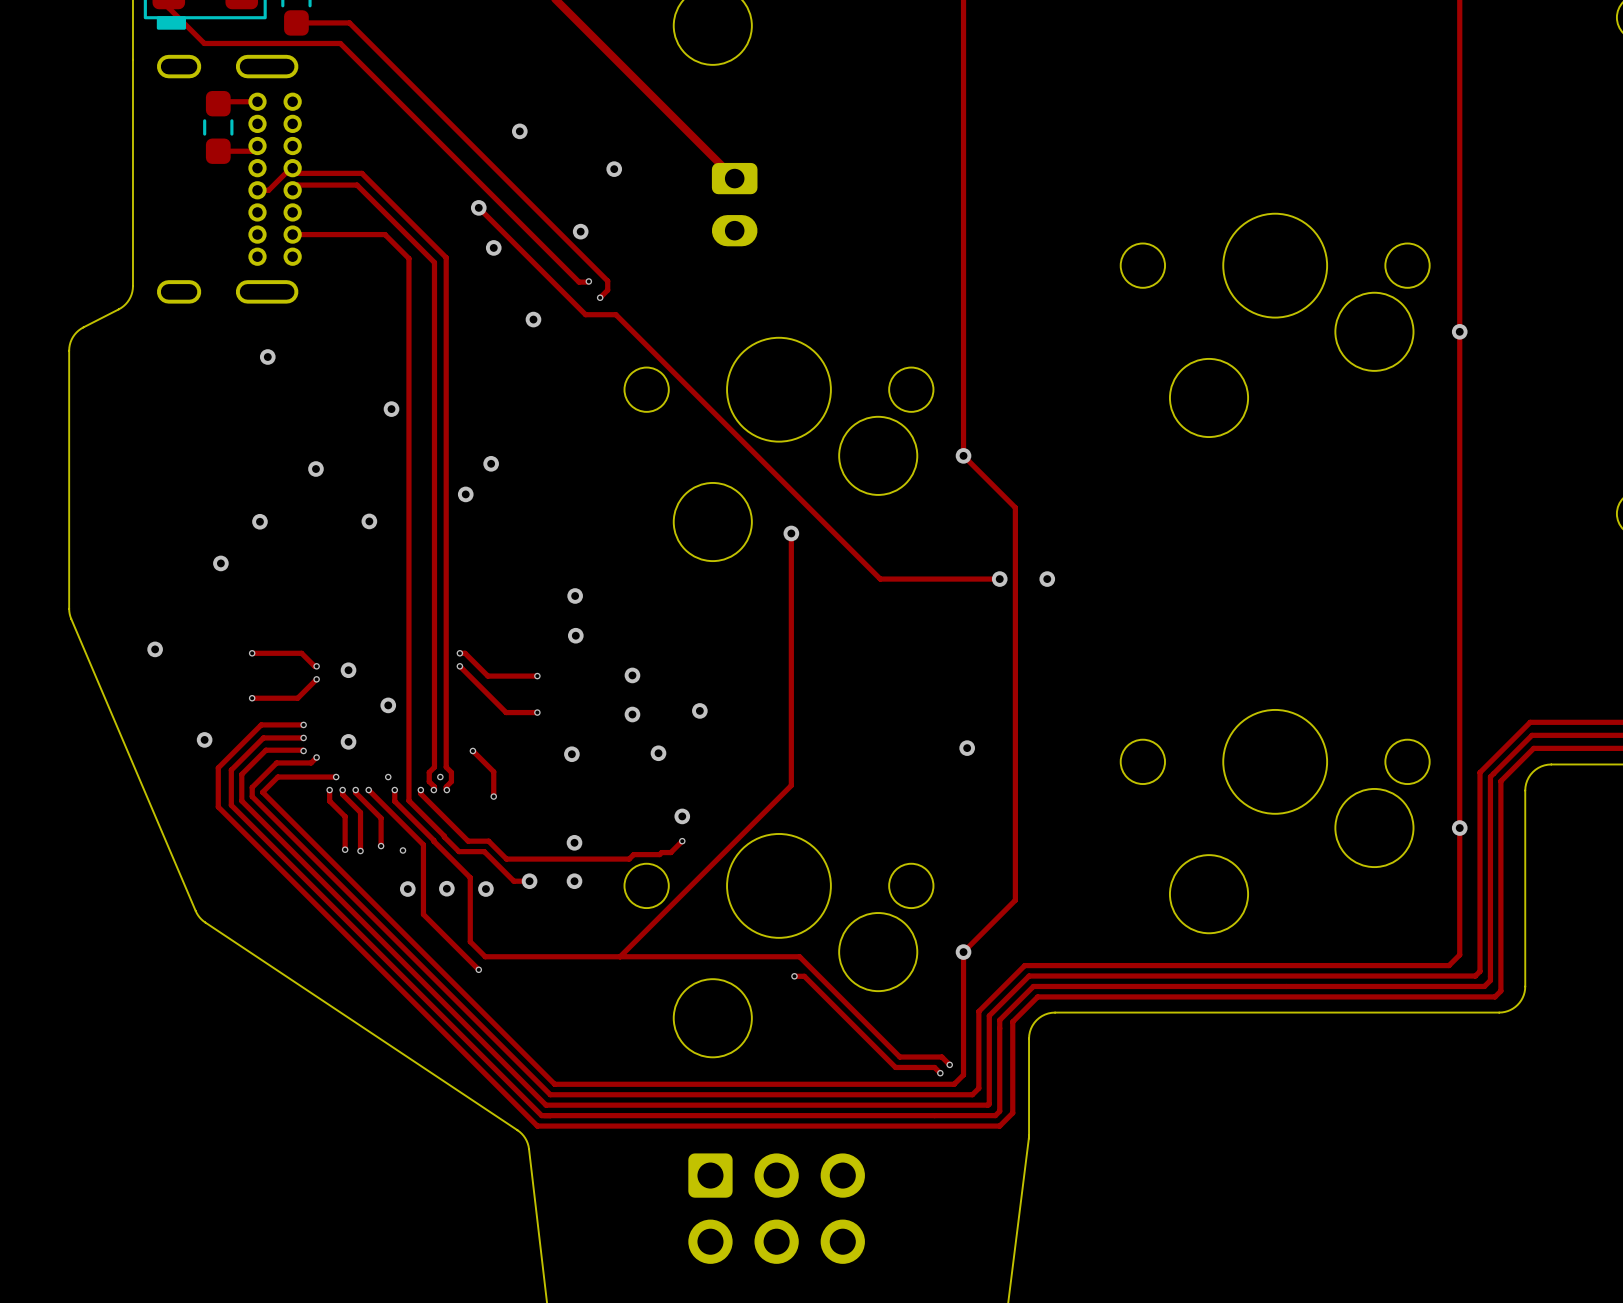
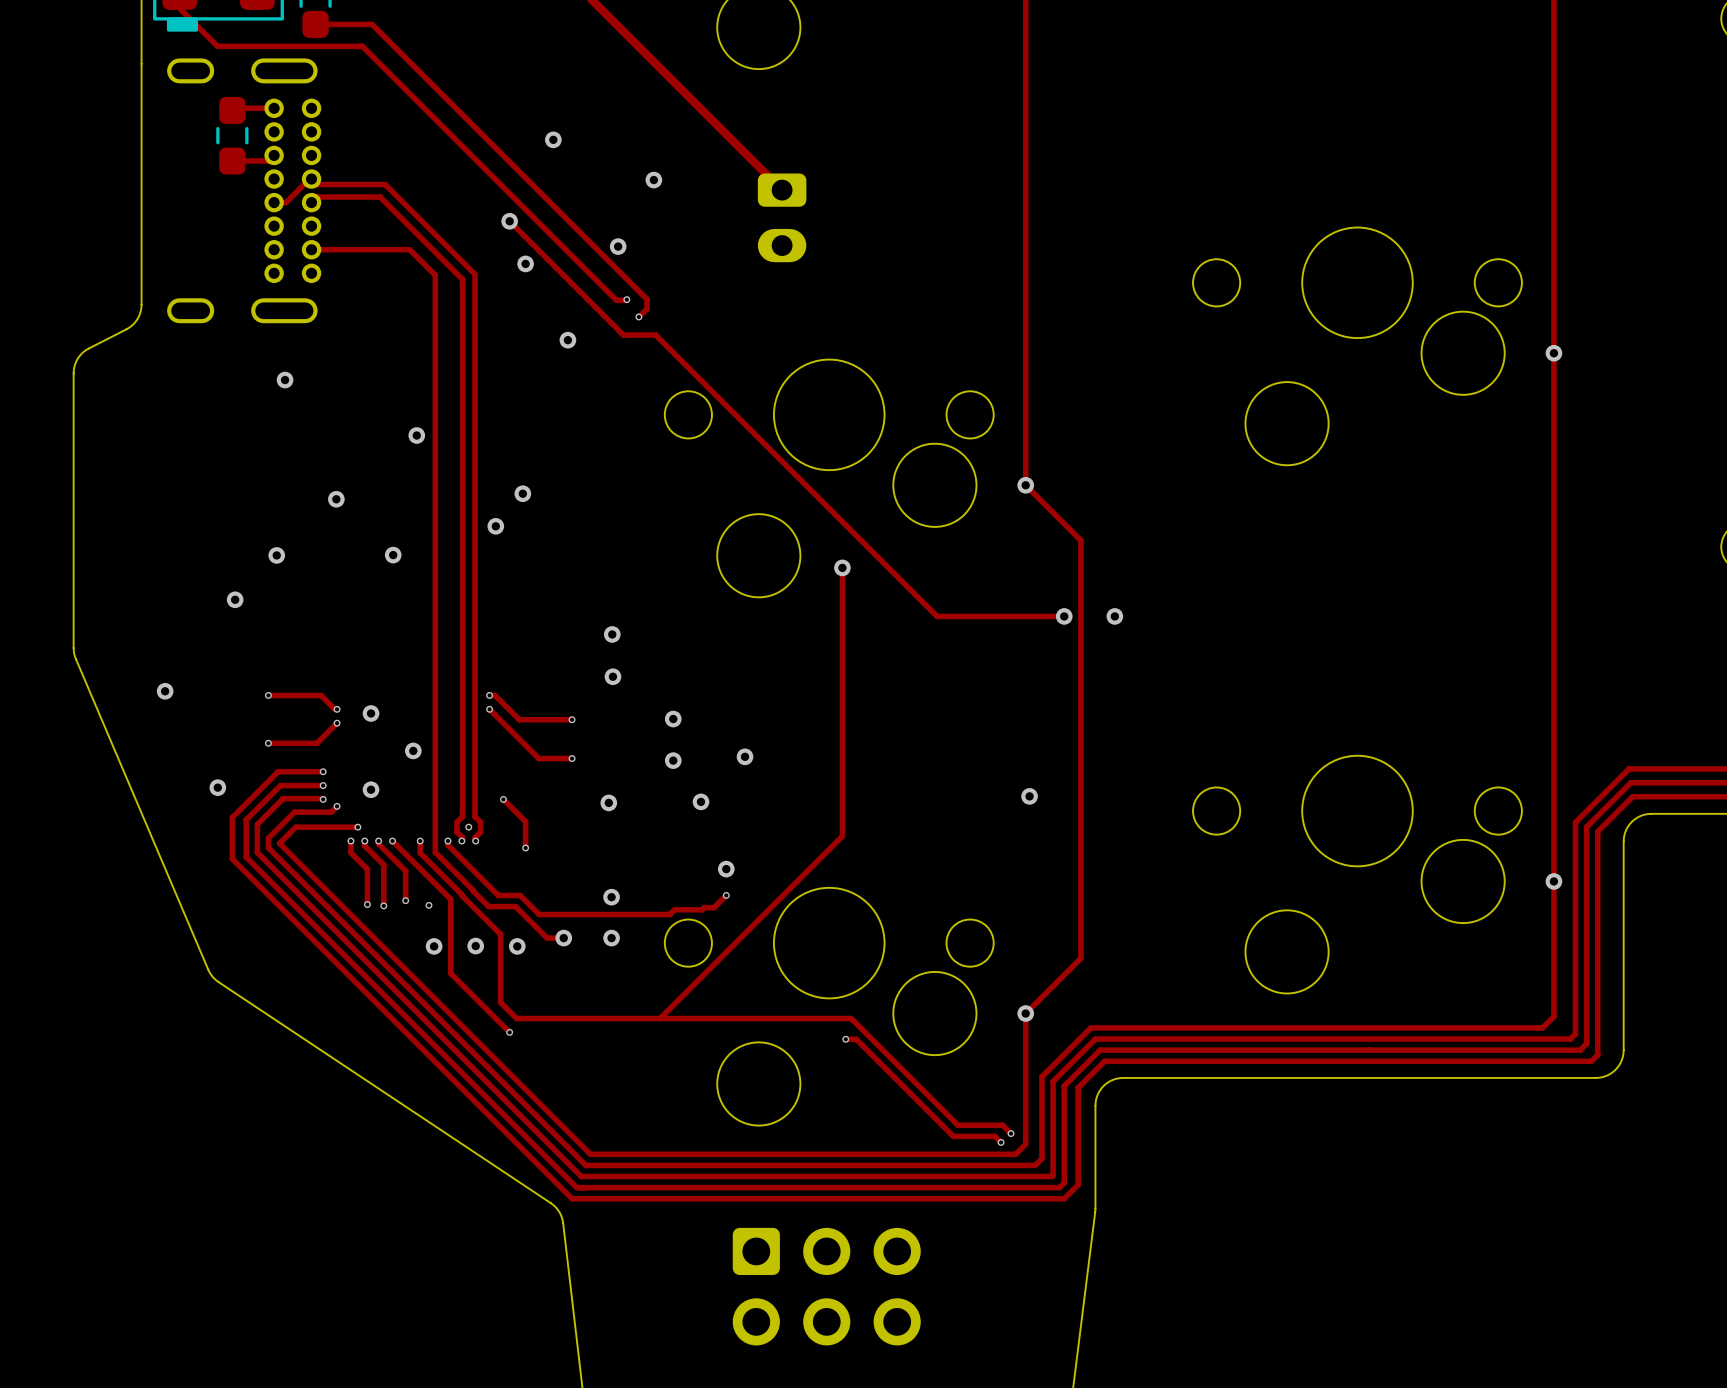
via: (388, 777) -> none

